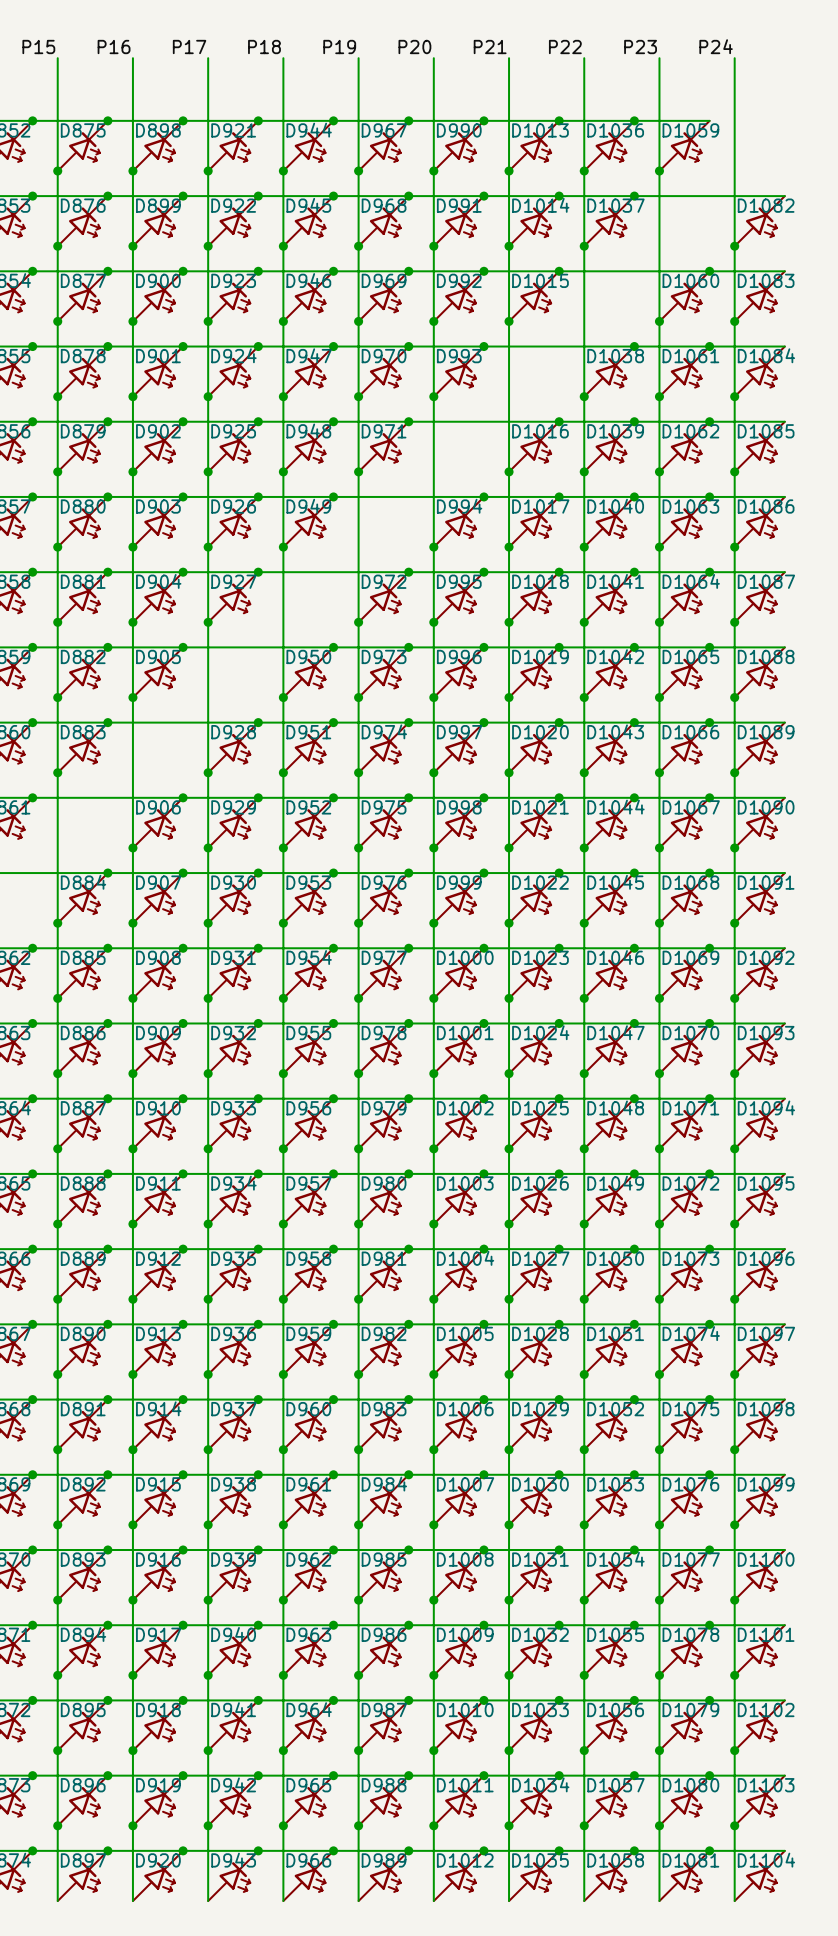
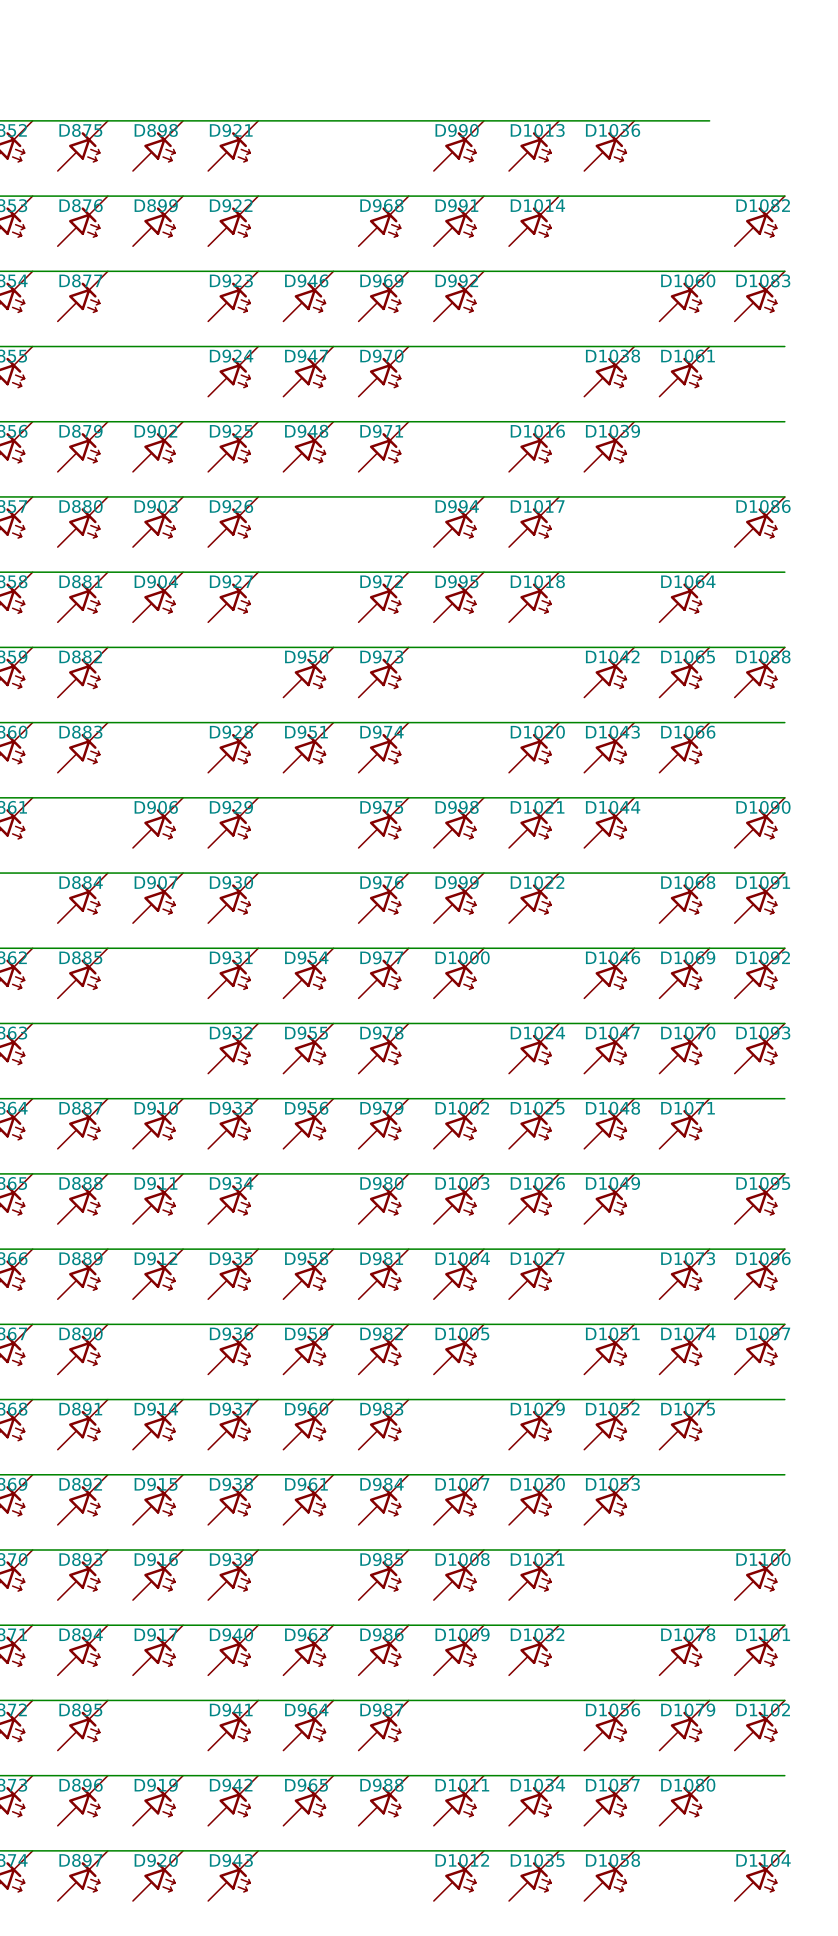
label: P24 (716, 46) -> none
label: P15 (38, 47) -> none
label: P16 (114, 47) -> none
label: P17 (189, 47) -> none
label: P18 (264, 47) -> none
label: P19 (339, 47) -> none
label: P20 (414, 47) -> none
label: P21 (490, 47) -> none
label: P22 (565, 47) -> none
label: P23 (640, 47) -> none
wire: (57, 58) (57, 1901) -> none
wire: (132, 58) (132, 1901) -> none
wire: (208, 58) (208, 1901) -> none
wire: (283, 58) (283, 1901) -> none
wire: (358, 58) (358, 1901) -> none
wire: (433, 58) (433, 1901) -> none
wire: (509, 58) (509, 1901) -> none
wire: (584, 58) (584, 1901) -> none
wire: (659, 58) (659, 1901) -> none
wire: (734, 58) (734, 1901) -> none
junction: (32, 120) -> none
junction: (107, 120) -> none
junction: (183, 120) -> none
junction: (258, 120) -> none
junction: (333, 120) -> none
junction: (408, 120) -> none
junction: (483, 120) -> none
junction: (559, 120) -> none
junction: (634, 120) -> none
D944: (308, 145) -> none
D967: (383, 145) -> none
D1059: (684, 145) -> none
junction: (57, 171) -> none
junction: (132, 171) -> none
junction: (208, 171) -> none
junction: (283, 171) -> none
junction: (358, 171) -> none
junction: (433, 171) -> none
junction: (509, 171) -> none
junction: (584, 171) -> none
junction: (659, 171) -> none
junction: (32, 196) -> none
junction: (107, 196) -> none
junction: (183, 196) -> none
junction: (258, 196) -> none
junction: (333, 196) -> none
junction: (408, 196) -> none
junction: (483, 196) -> none
junction: (559, 196) -> none
junction: (634, 196) -> none
D945: (308, 221) -> none
D1037: (609, 221) -> none
junction: (57, 246) -> none
junction: (132, 246) -> none
junction: (208, 246) -> none
junction: (283, 246) -> none
junction: (358, 246) -> none
junction: (433, 246) -> none
junction: (509, 246) -> none
junction: (584, 246) -> none
junction: (734, 246) -> none
junction: (32, 271) -> none
junction: (107, 271) -> none
junction: (183, 271) -> none
junction: (258, 271) -> none
junction: (333, 271) -> none
junction: (408, 271) -> none
junction: (483, 271) -> none
junction: (559, 271) -> none
junction: (709, 271) -> none
D900: (158, 296) -> none
D1015: (534, 296) -> none
junction: (57, 321) -> none
junction: (132, 321) -> none
junction: (208, 321) -> none
junction: (283, 321) -> none
junction: (358, 321) -> none
junction: (433, 321) -> none
junction: (509, 321) -> none
junction: (659, 321) -> none
junction: (734, 321) -> none
junction: (32, 346) -> none
junction: (107, 346) -> none
junction: (183, 346) -> none
junction: (258, 346) -> none
junction: (333, 346) -> none
junction: (408, 346) -> none
junction: (483, 346) -> none
junction: (634, 346) -> none
junction: (709, 346) -> none
D878: (82, 371) -> none
D901: (158, 371) -> none
D993: (458, 371) -> none
D1084: (759, 371) -> none
junction: (57, 396) -> none
junction: (132, 396) -> none
junction: (208, 396) -> none
junction: (283, 396) -> none
junction: (358, 396) -> none
junction: (433, 396) -> none
junction: (584, 396) -> none
junction: (659, 396) -> none
junction: (734, 396) -> none
junction: (32, 421) -> none
junction: (107, 421) -> none
junction: (183, 421) -> none
junction: (258, 421) -> none
junction: (333, 421) -> none
junction: (408, 421) -> none
junction: (559, 421) -> none
junction: (634, 421) -> none
junction: (709, 421) -> none
D1062: (684, 446) -> none
D1085: (759, 446) -> none
junction: (57, 471) -> none
junction: (132, 471) -> none
junction: (208, 471) -> none
junction: (283, 471) -> none
junction: (358, 471) -> none
junction: (509, 471) -> none
junction: (584, 471) -> none
junction: (659, 471) -> none
junction: (734, 471) -> none
junction: (32, 496) -> none
junction: (107, 496) -> none
junction: (183, 496) -> none
junction: (258, 496) -> none
junction: (333, 496) -> none
junction: (483, 496) -> none
junction: (559, 496) -> none
junction: (634, 496) -> none
junction: (709, 496) -> none
D949: (308, 522) -> none
D1040: (609, 522) -> none
D1063: (684, 522) -> none
junction: (57, 547) -> none
junction: (132, 547) -> none
junction: (208, 547) -> none
junction: (283, 547) -> none
junction: (433, 547) -> none
junction: (509, 547) -> none
junction: (584, 547) -> none
junction: (659, 547) -> none
junction: (734, 547) -> none
junction: (32, 572) -> none
junction: (107, 572) -> none
junction: (183, 572) -> none
junction: (258, 572) -> none
junction: (408, 572) -> none
junction: (483, 572) -> none
junction: (559, 572) -> none
junction: (634, 572) -> none
junction: (709, 572) -> none
D1041: (609, 597) -> none
D1087: (759, 597) -> none
junction: (57, 622) -> none
junction: (132, 622) -> none
junction: (208, 622) -> none
junction: (358, 622) -> none
junction: (433, 622) -> none
junction: (509, 622) -> none
junction: (584, 622) -> none
junction: (659, 622) -> none
junction: (734, 622) -> none
junction: (32, 647) -> none
junction: (107, 647) -> none
junction: (183, 647) -> none
junction: (333, 647) -> none
junction: (408, 647) -> none
junction: (483, 647) -> none
junction: (559, 647) -> none
junction: (634, 647) -> none
junction: (709, 647) -> none
D905: (158, 672) -> none
D996: (458, 672) -> none
D1019: (534, 672) -> none
junction: (57, 697) -> none
junction: (132, 697) -> none
junction: (283, 697) -> none
junction: (358, 697) -> none
junction: (433, 697) -> none
junction: (509, 697) -> none
junction: (584, 697) -> none
junction: (659, 697) -> none
junction: (734, 697) -> none
junction: (32, 722) -> none
junction: (107, 722) -> none
junction: (258, 722) -> none
junction: (333, 722) -> none
junction: (408, 722) -> none
junction: (483, 722) -> none
junction: (559, 722) -> none
junction: (634, 722) -> none
junction: (709, 722) -> none
D997: (458, 747) -> none
D1089: (759, 747) -> none
junction: (57, 772) -> none
junction: (208, 772) -> none
junction: (283, 772) -> none
junction: (358, 772) -> none
junction: (433, 772) -> none
junction: (509, 772) -> none
junction: (584, 772) -> none
junction: (659, 772) -> none
junction: (734, 772) -> none
junction: (32, 797) -> none
junction: (183, 797) -> none
junction: (258, 797) -> none
junction: (333, 797) -> none
junction: (408, 797) -> none
junction: (483, 797) -> none
junction: (559, 797) -> none
junction: (634, 797) -> none
junction: (709, 797) -> none
D952: (308, 822) -> none
D1067: (684, 822) -> none
junction: (132, 847) -> none
junction: (208, 847) -> none
junction: (283, 847) -> none
junction: (358, 847) -> none
junction: (433, 847) -> none
junction: (509, 847) -> none
junction: (584, 847) -> none
junction: (659, 847) -> none
junction: (734, 847) -> none
junction: (107, 873) -> none
junction: (183, 873) -> none
junction: (258, 873) -> none
junction: (333, 873) -> none
junction: (408, 873) -> none
junction: (483, 873) -> none
junction: (559, 873) -> none
junction: (634, 873) -> none
junction: (709, 873) -> none
D953: (308, 898) -> none
D1045: (609, 898) -> none
junction: (57, 923) -> none
junction: (132, 923) -> none
junction: (208, 923) -> none
junction: (283, 923) -> none
junction: (358, 923) -> none
junction: (433, 923) -> none
junction: (509, 923) -> none
junction: (584, 923) -> none
junction: (659, 923) -> none
junction: (734, 923) -> none
junction: (32, 948) -> none
junction: (107, 948) -> none
junction: (183, 948) -> none
junction: (258, 948) -> none
junction: (333, 948) -> none
junction: (408, 948) -> none
junction: (483, 948) -> none
junction: (559, 948) -> none
junction: (634, 948) -> none
junction: (709, 948) -> none
D908: (158, 973) -> none
D1023: (534, 973) -> none
junction: (57, 998) -> none
junction: (132, 998) -> none
junction: (208, 998) -> none
junction: (283, 998) -> none
junction: (358, 998) -> none
junction: (433, 998) -> none
junction: (509, 998) -> none
junction: (584, 998) -> none
junction: (659, 998) -> none
junction: (734, 998) -> none
junction: (32, 1023) -> none
junction: (107, 1023) -> none
junction: (183, 1023) -> none
junction: (258, 1023) -> none
junction: (333, 1023) -> none
junction: (408, 1023) -> none
junction: (483, 1023) -> none
junction: (559, 1023) -> none
junction: (634, 1023) -> none
junction: (709, 1023) -> none
D886: (82, 1048) -> none
D909: (158, 1048) -> none
D1001: (458, 1048) -> none
junction: (57, 1073) -> none
junction: (132, 1073) -> none
junction: (208, 1073) -> none
junction: (283, 1073) -> none
junction: (358, 1073) -> none
junction: (433, 1073) -> none
junction: (509, 1073) -> none
junction: (584, 1073) -> none
junction: (659, 1073) -> none
junction: (734, 1073) -> none
junction: (32, 1098) -> none
junction: (107, 1098) -> none
junction: (183, 1098) -> none
junction: (258, 1098) -> none
junction: (333, 1098) -> none
junction: (408, 1098) -> none
junction: (483, 1098) -> none
junction: (559, 1098) -> none
junction: (634, 1098) -> none
junction: (709, 1098) -> none
D1094: (759, 1123) -> none
junction: (57, 1148) -> none
junction: (132, 1148) -> none
junction: (208, 1148) -> none
junction: (283, 1148) -> none
junction: (358, 1148) -> none
junction: (433, 1148) -> none
junction: (509, 1148) -> none
junction: (584, 1148) -> none
junction: (659, 1148) -> none
junction: (734, 1148) -> none
junction: (32, 1173) -> none
junction: (107, 1173) -> none
junction: (183, 1173) -> none
junction: (258, 1173) -> none
junction: (333, 1173) -> none
junction: (408, 1173) -> none
junction: (483, 1173) -> none
junction: (559, 1173) -> none
junction: (634, 1173) -> none
junction: (709, 1173) -> none
D957: (308, 1198) -> none
D1072: (684, 1198) -> none
junction: (57, 1224) -> none
junction: (132, 1224) -> none
junction: (208, 1224) -> none
junction: (283, 1224) -> none
junction: (358, 1224) -> none
junction: (433, 1224) -> none
junction: (509, 1224) -> none
junction: (584, 1224) -> none
junction: (659, 1224) -> none
junction: (734, 1224) -> none
junction: (32, 1249) -> none
junction: (107, 1249) -> none
junction: (183, 1249) -> none
junction: (258, 1249) -> none
junction: (333, 1249) -> none
junction: (408, 1249) -> none
junction: (483, 1249) -> none
junction: (559, 1249) -> none
junction: (634, 1249) -> none
junction: (709, 1249) -> none
D1050: (609, 1274) -> none
junction: (57, 1299) -> none
junction: (132, 1299) -> none
junction: (208, 1299) -> none
junction: (283, 1299) -> none
junction: (358, 1299) -> none
junction: (433, 1299) -> none
junction: (509, 1299) -> none
junction: (584, 1299) -> none
junction: (659, 1299) -> none
junction: (734, 1299) -> none
junction: (32, 1324) -> none
junction: (107, 1324) -> none
junction: (183, 1324) -> none
junction: (258, 1324) -> none
junction: (333, 1324) -> none
junction: (408, 1324) -> none
junction: (483, 1324) -> none
junction: (559, 1324) -> none
junction: (634, 1324) -> none
junction: (709, 1324) -> none
D913: (158, 1349) -> none
D1028: (534, 1349) -> none
junction: (57, 1374) -> none
junction: (132, 1374) -> none
junction: (208, 1374) -> none
junction: (283, 1374) -> none
junction: (358, 1374) -> none
junction: (433, 1374) -> none
junction: (509, 1374) -> none
junction: (584, 1374) -> none
junction: (659, 1374) -> none
junction: (734, 1374) -> none
junction: (32, 1399) -> none
junction: (107, 1399) -> none
junction: (183, 1399) -> none
junction: (258, 1399) -> none
junction: (333, 1399) -> none
junction: (408, 1399) -> none
junction: (483, 1399) -> none
junction: (559, 1399) -> none
junction: (634, 1399) -> none
junction: (709, 1399) -> none
D1006: (458, 1424) -> none
D1098: (759, 1424) -> none
junction: (57, 1449) -> none
junction: (132, 1449) -> none
junction: (208, 1449) -> none
junction: (283, 1449) -> none
junction: (358, 1449) -> none
junction: (433, 1449) -> none
junction: (509, 1449) -> none
junction: (584, 1449) -> none
junction: (659, 1449) -> none
junction: (734, 1449) -> none
junction: (32, 1474) -> none
junction: (107, 1474) -> none
junction: (183, 1474) -> none
junction: (258, 1474) -> none
junction: (333, 1474) -> none
junction: (408, 1474) -> none
junction: (483, 1474) -> none
junction: (559, 1474) -> none
junction: (634, 1474) -> none
junction: (709, 1474) -> none
D1076: (684, 1499) -> none
D1099: (759, 1499) -> none
junction: (57, 1524) -> none
junction: (132, 1524) -> none
junction: (208, 1524) -> none
junction: (283, 1524) -> none
junction: (358, 1524) -> none
junction: (433, 1524) -> none
junction: (509, 1524) -> none
junction: (584, 1524) -> none
junction: (659, 1524) -> none
junction: (734, 1524) -> none
junction: (32, 1550) -> none
junction: (107, 1550) -> none
junction: (183, 1550) -> none
junction: (258, 1550) -> none
junction: (333, 1550) -> none
junction: (408, 1550) -> none
junction: (483, 1550) -> none
junction: (559, 1550) -> none
junction: (634, 1550) -> none
junction: (709, 1550) -> none
D962: (308, 1575) -> none
D1054: (609, 1575) -> none
D1077: (684, 1575) -> none
junction: (57, 1600) -> none
junction: (132, 1600) -> none
junction: (208, 1600) -> none
junction: (283, 1600) -> none
junction: (358, 1600) -> none
junction: (433, 1600) -> none
junction: (509, 1600) -> none
junction: (584, 1600) -> none
junction: (659, 1600) -> none
junction: (734, 1600) -> none
junction: (32, 1625) -> none
junction: (107, 1625) -> none
junction: (183, 1625) -> none
junction: (258, 1625) -> none
junction: (333, 1625) -> none
junction: (408, 1625) -> none
junction: (483, 1625) -> none
junction: (559, 1625) -> none
junction: (634, 1625) -> none
junction: (709, 1625) -> none
D1055: (609, 1650) -> none
junction: (57, 1675) -> none
junction: (132, 1675) -> none
junction: (208, 1675) -> none
junction: (283, 1675) -> none
junction: (358, 1675) -> none
junction: (433, 1675) -> none
junction: (509, 1675) -> none
junction: (584, 1675) -> none
junction: (659, 1675) -> none
junction: (734, 1675) -> none
junction: (32, 1700) -> none
junction: (107, 1700) -> none
junction: (183, 1700) -> none
junction: (258, 1700) -> none
junction: (333, 1700) -> none
junction: (408, 1700) -> none
junction: (483, 1700) -> none
junction: (559, 1700) -> none
junction: (634, 1700) -> none
junction: (709, 1700) -> none
D918: (158, 1725) -> none
D1010: (458, 1725) -> none
D1033: (534, 1725) -> none
junction: (57, 1750) -> none
junction: (132, 1750) -> none
junction: (208, 1750) -> none
junction: (283, 1750) -> none
junction: (358, 1750) -> none
junction: (433, 1750) -> none
junction: (509, 1750) -> none
junction: (584, 1750) -> none
junction: (659, 1750) -> none
junction: (734, 1750) -> none
junction: (32, 1775) -> none
junction: (107, 1775) -> none
junction: (183, 1775) -> none
junction: (258, 1775) -> none
junction: (333, 1775) -> none
junction: (408, 1775) -> none
junction: (483, 1775) -> none
junction: (559, 1775) -> none
junction: (634, 1775) -> none
junction: (709, 1775) -> none
D1103: (759, 1800) -> none
junction: (57, 1825) -> none
junction: (132, 1825) -> none
junction: (208, 1825) -> none
junction: (283, 1825) -> none
junction: (358, 1825) -> none
junction: (433, 1825) -> none
junction: (509, 1825) -> none
junction: (584, 1825) -> none
junction: (659, 1825) -> none
junction: (734, 1825) -> none
junction: (32, 1850) -> none
junction: (107, 1850) -> none
junction: (183, 1850) -> none
junction: (258, 1850) -> none
junction: (333, 1850) -> none
junction: (408, 1850) -> none
junction: (483, 1850) -> none
junction: (559, 1850) -> none
junction: (634, 1850) -> none
junction: (709, 1850) -> none
D966: (308, 1875) -> none
D989: (383, 1875) -> none
D1081: (684, 1875) -> none

